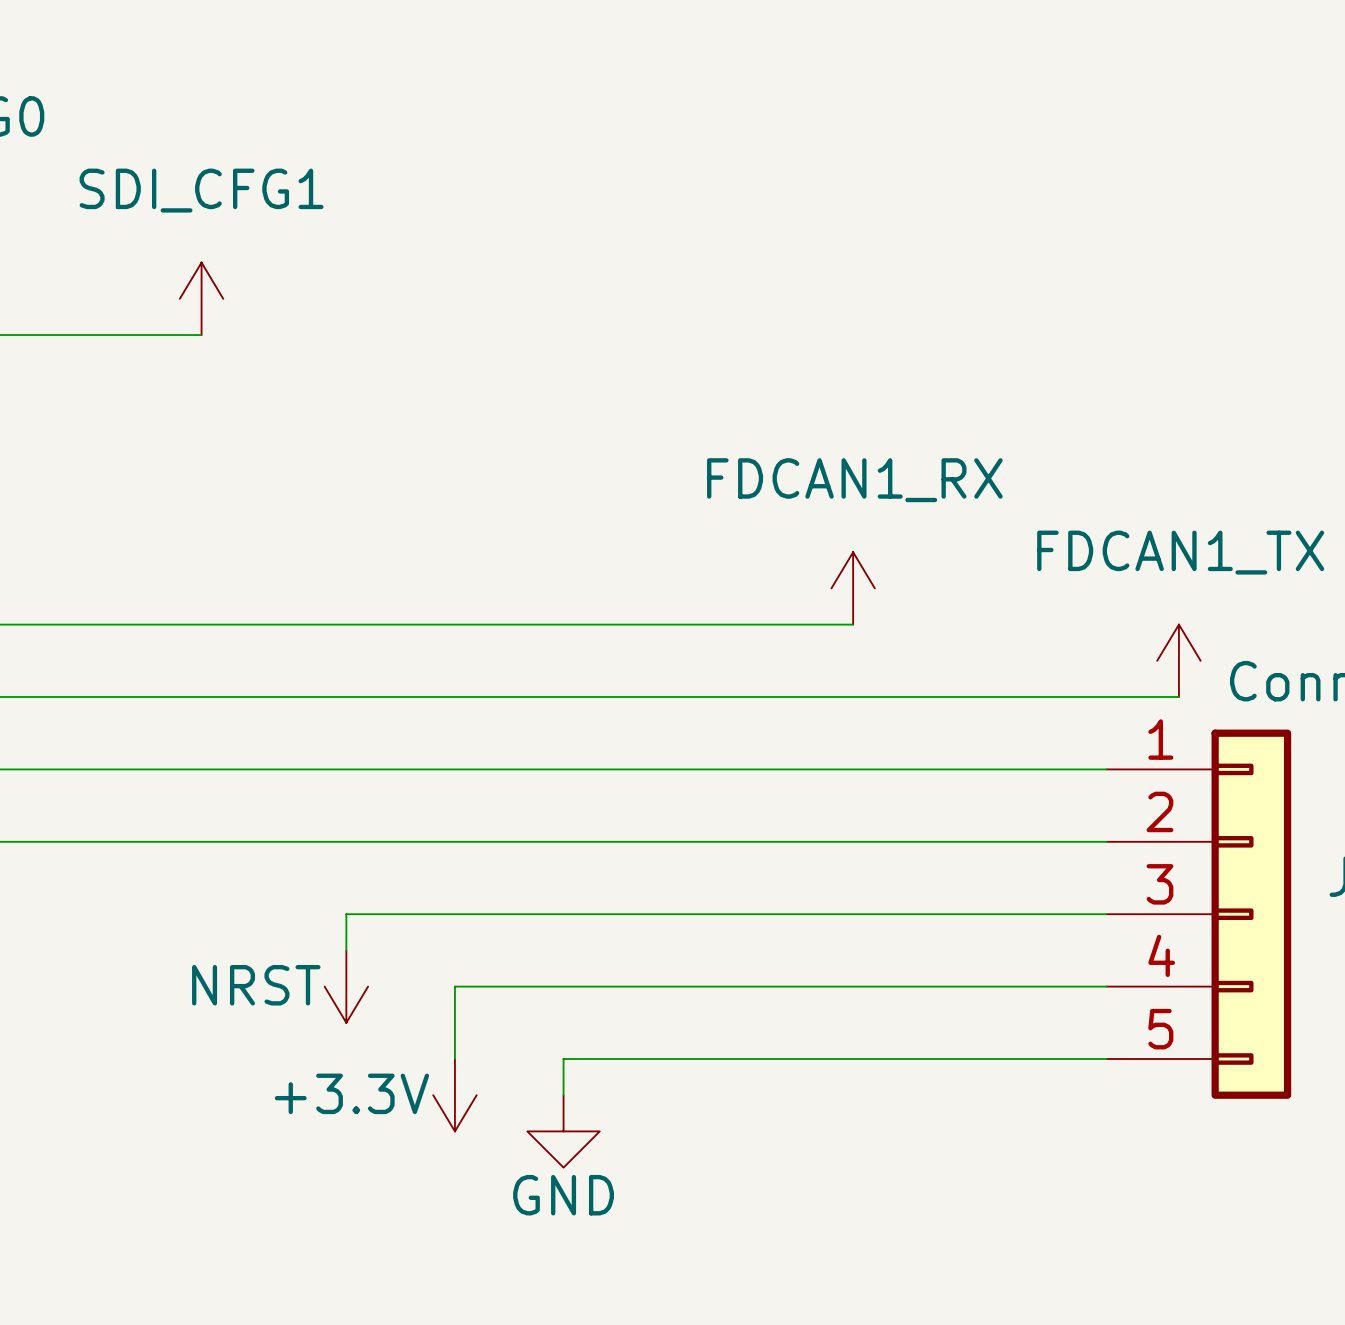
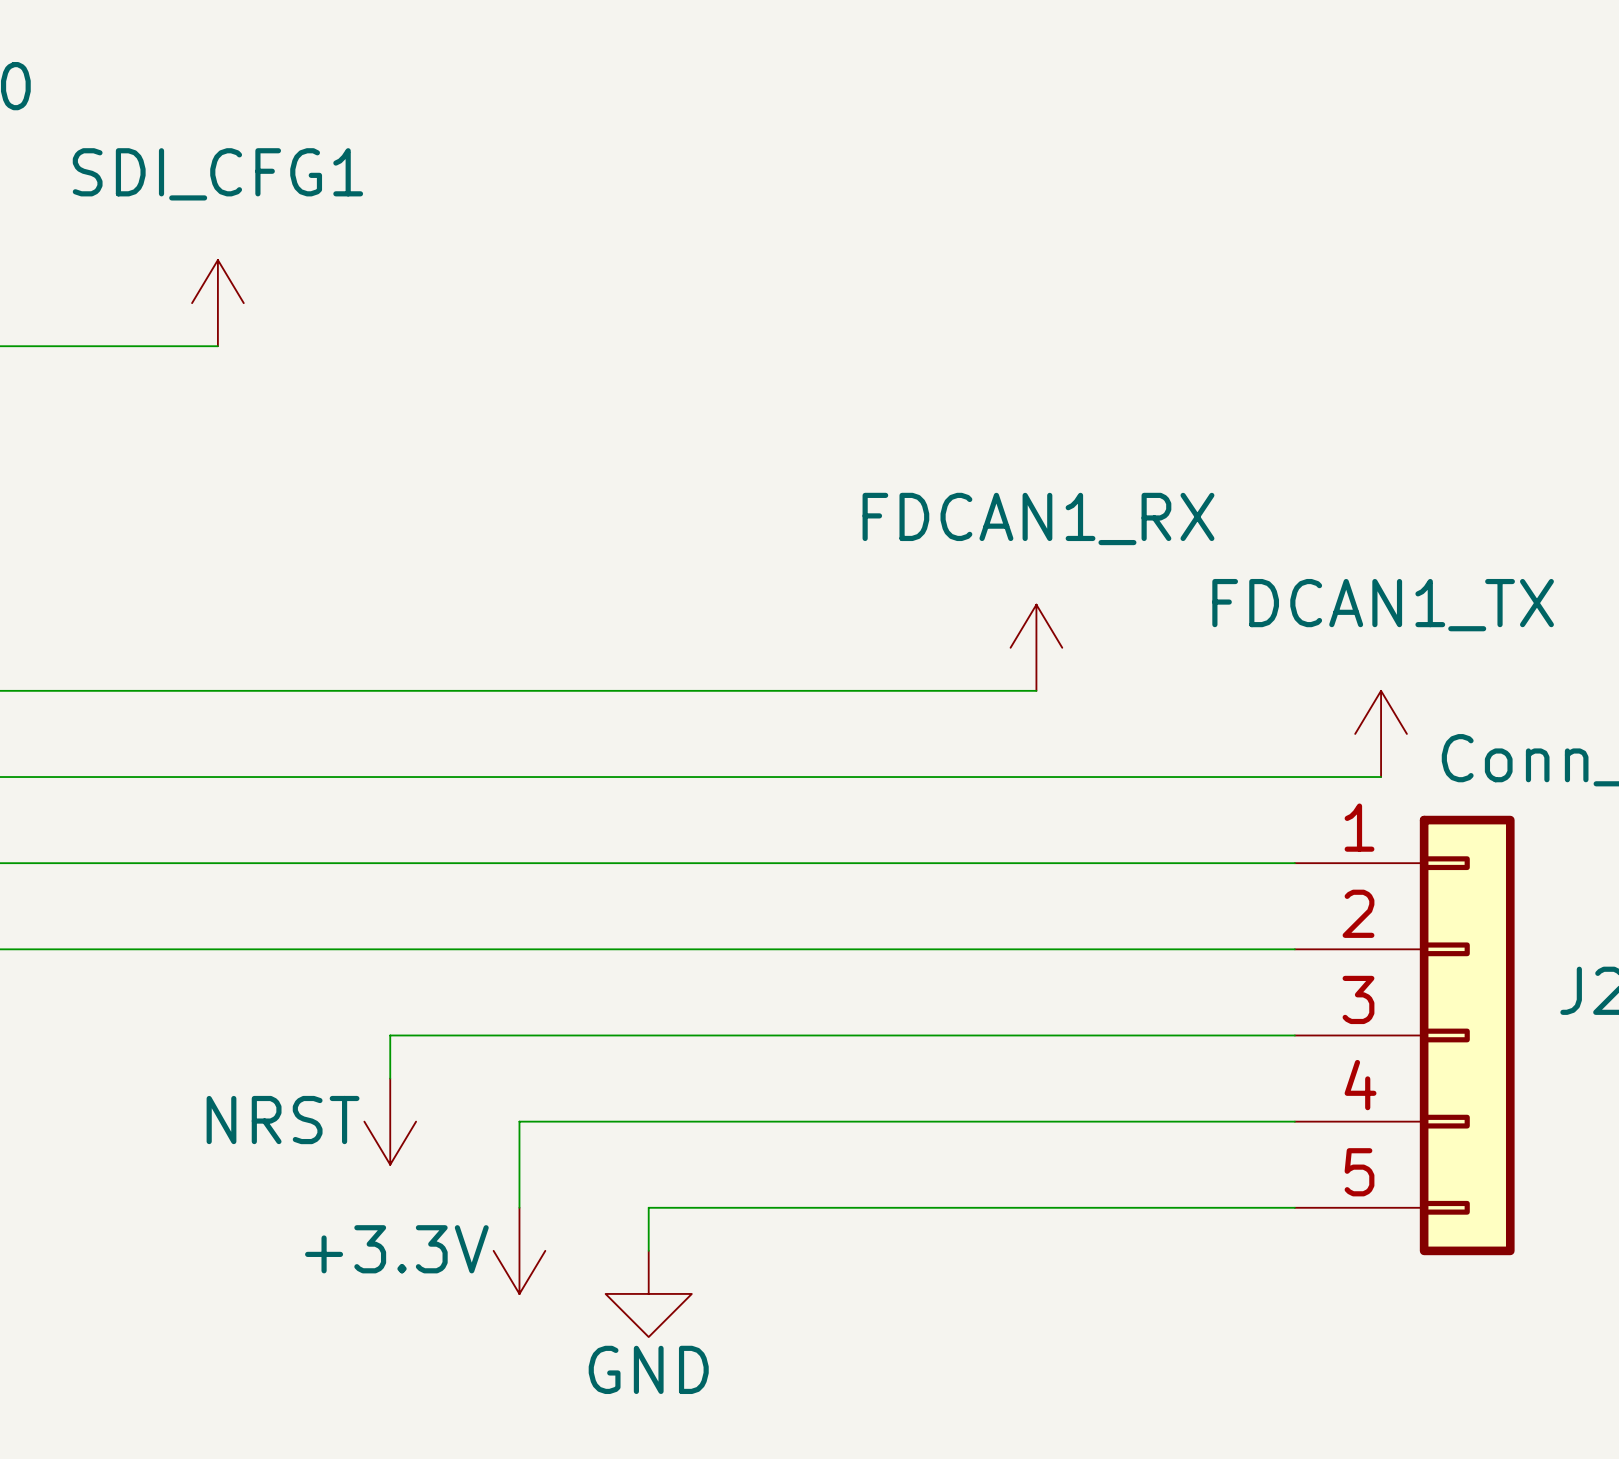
power symbol position: FDCAN1_RX (853, 588) -> FDCAN1_RX (1036, 647)
wire: none -> (993, 690) (1036, 690)

